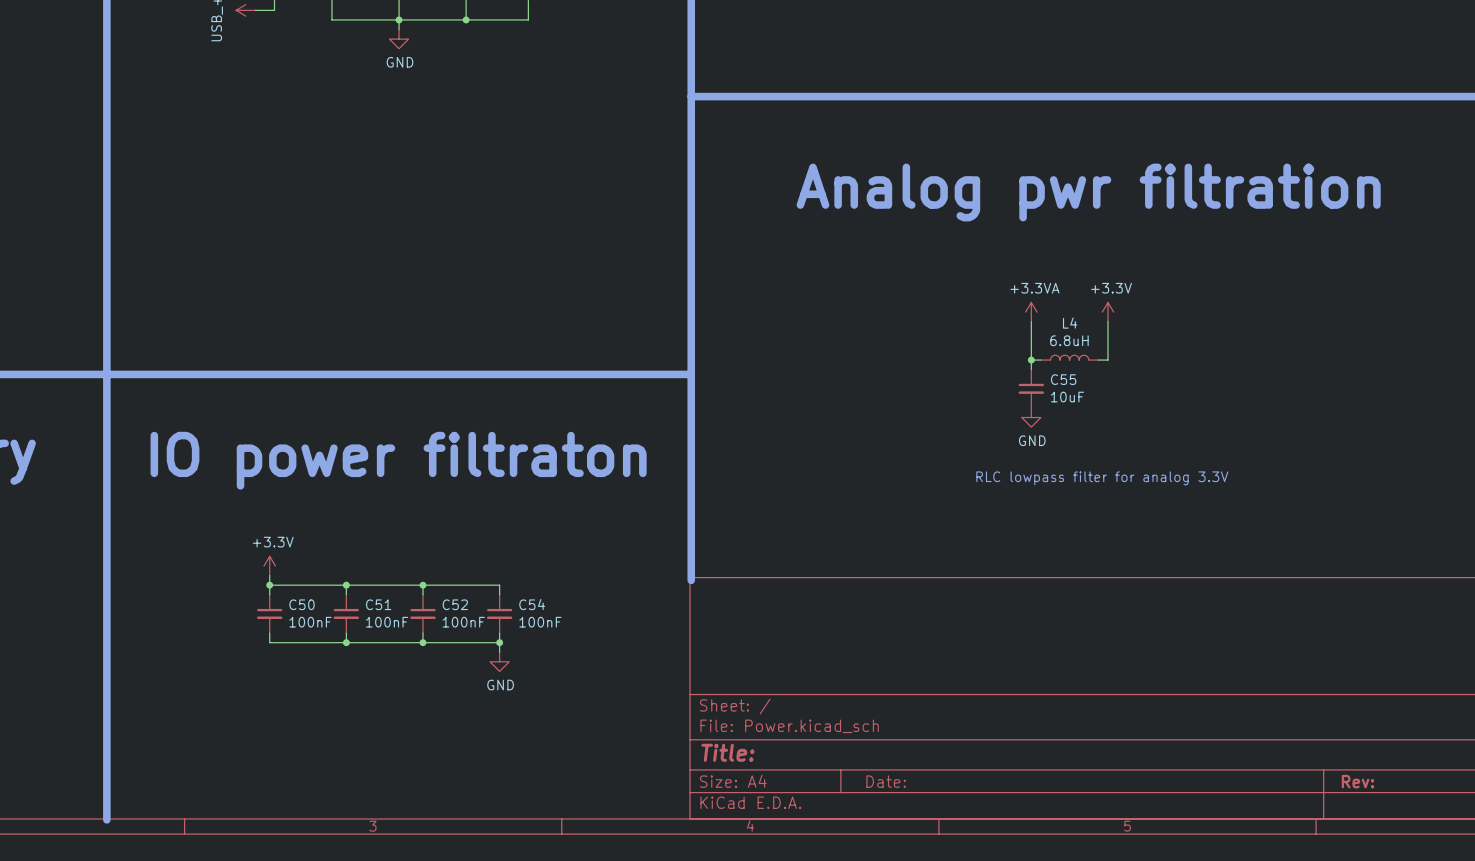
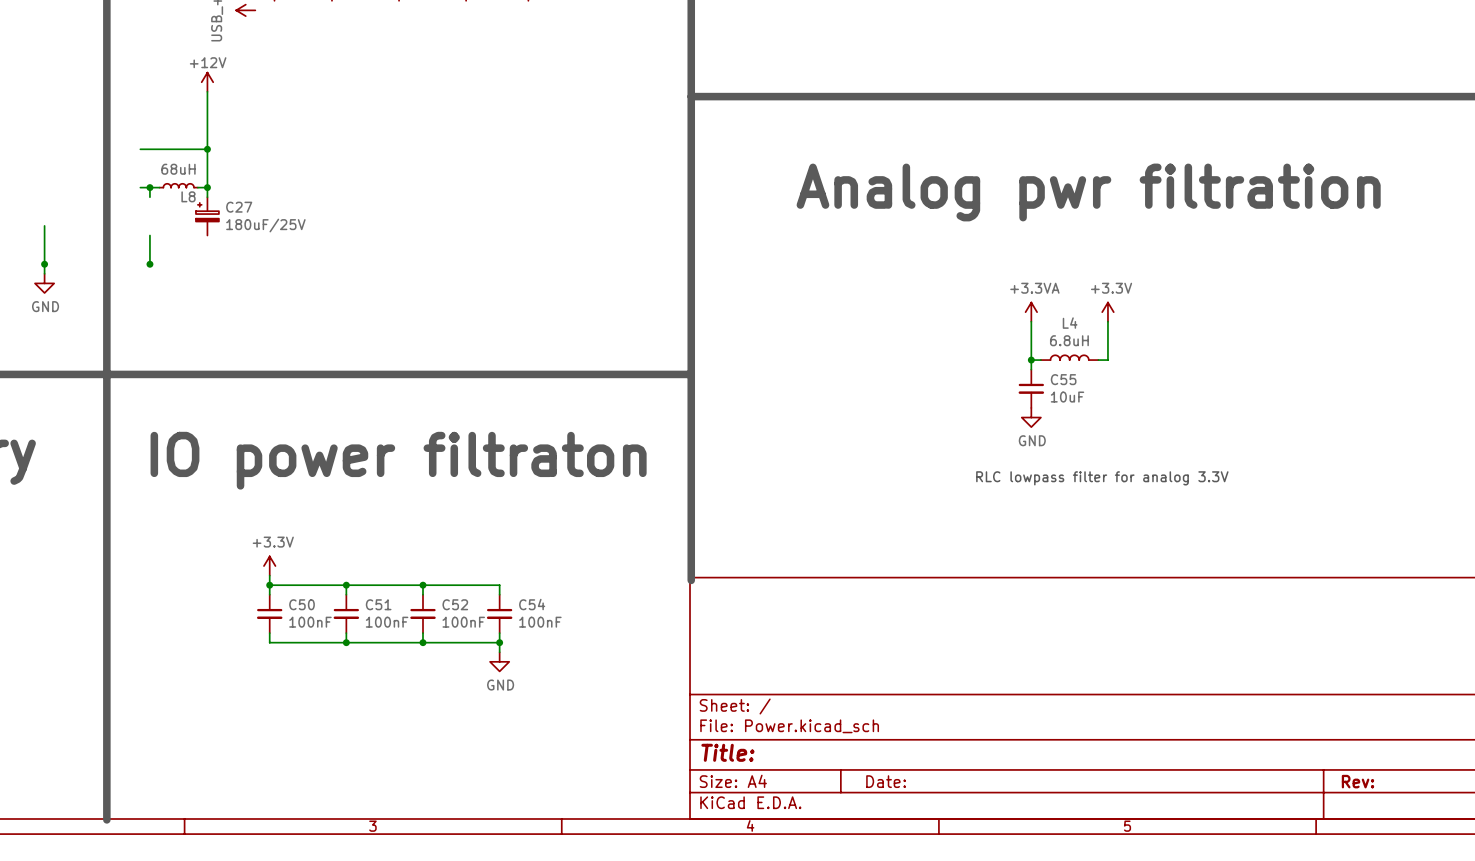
wire: (274, 0) (274, 10) (255, 10) -> none
wire: (331, 0) (331, 19) (528, 19) (528, 0) -> none
wire: (399, 0) (399, 29) -> none
wire: (466, 0) (466, 19) -> none
junction: (399, 19) -> none
junction: (466, 19) -> none
power symbol: GND (399, 39) -> none
power symbol: none -> +12V (207, 82)
wire: none -> (207, 91) (207, 197)
wire: none -> (140, 149) (207, 149)
junction: none -> (207, 149)
L8: none -> 68uH (178, 185)
wire: none -> (140, 187) (159, 187)
wire: none -> (149, 187) (149, 197)
junction: none -> (149, 187)
wire: none -> (197, 187) (207, 187)
junction: none -> (207, 187)
C27: none -> 180uF/25V (207, 216)
wire: none -> (44, 225) (44, 273)
wire: none -> (149, 235) (149, 264)
junction: none -> (44, 264)
junction: none -> (149, 264)
power symbol: none -> GND (44, 283)

